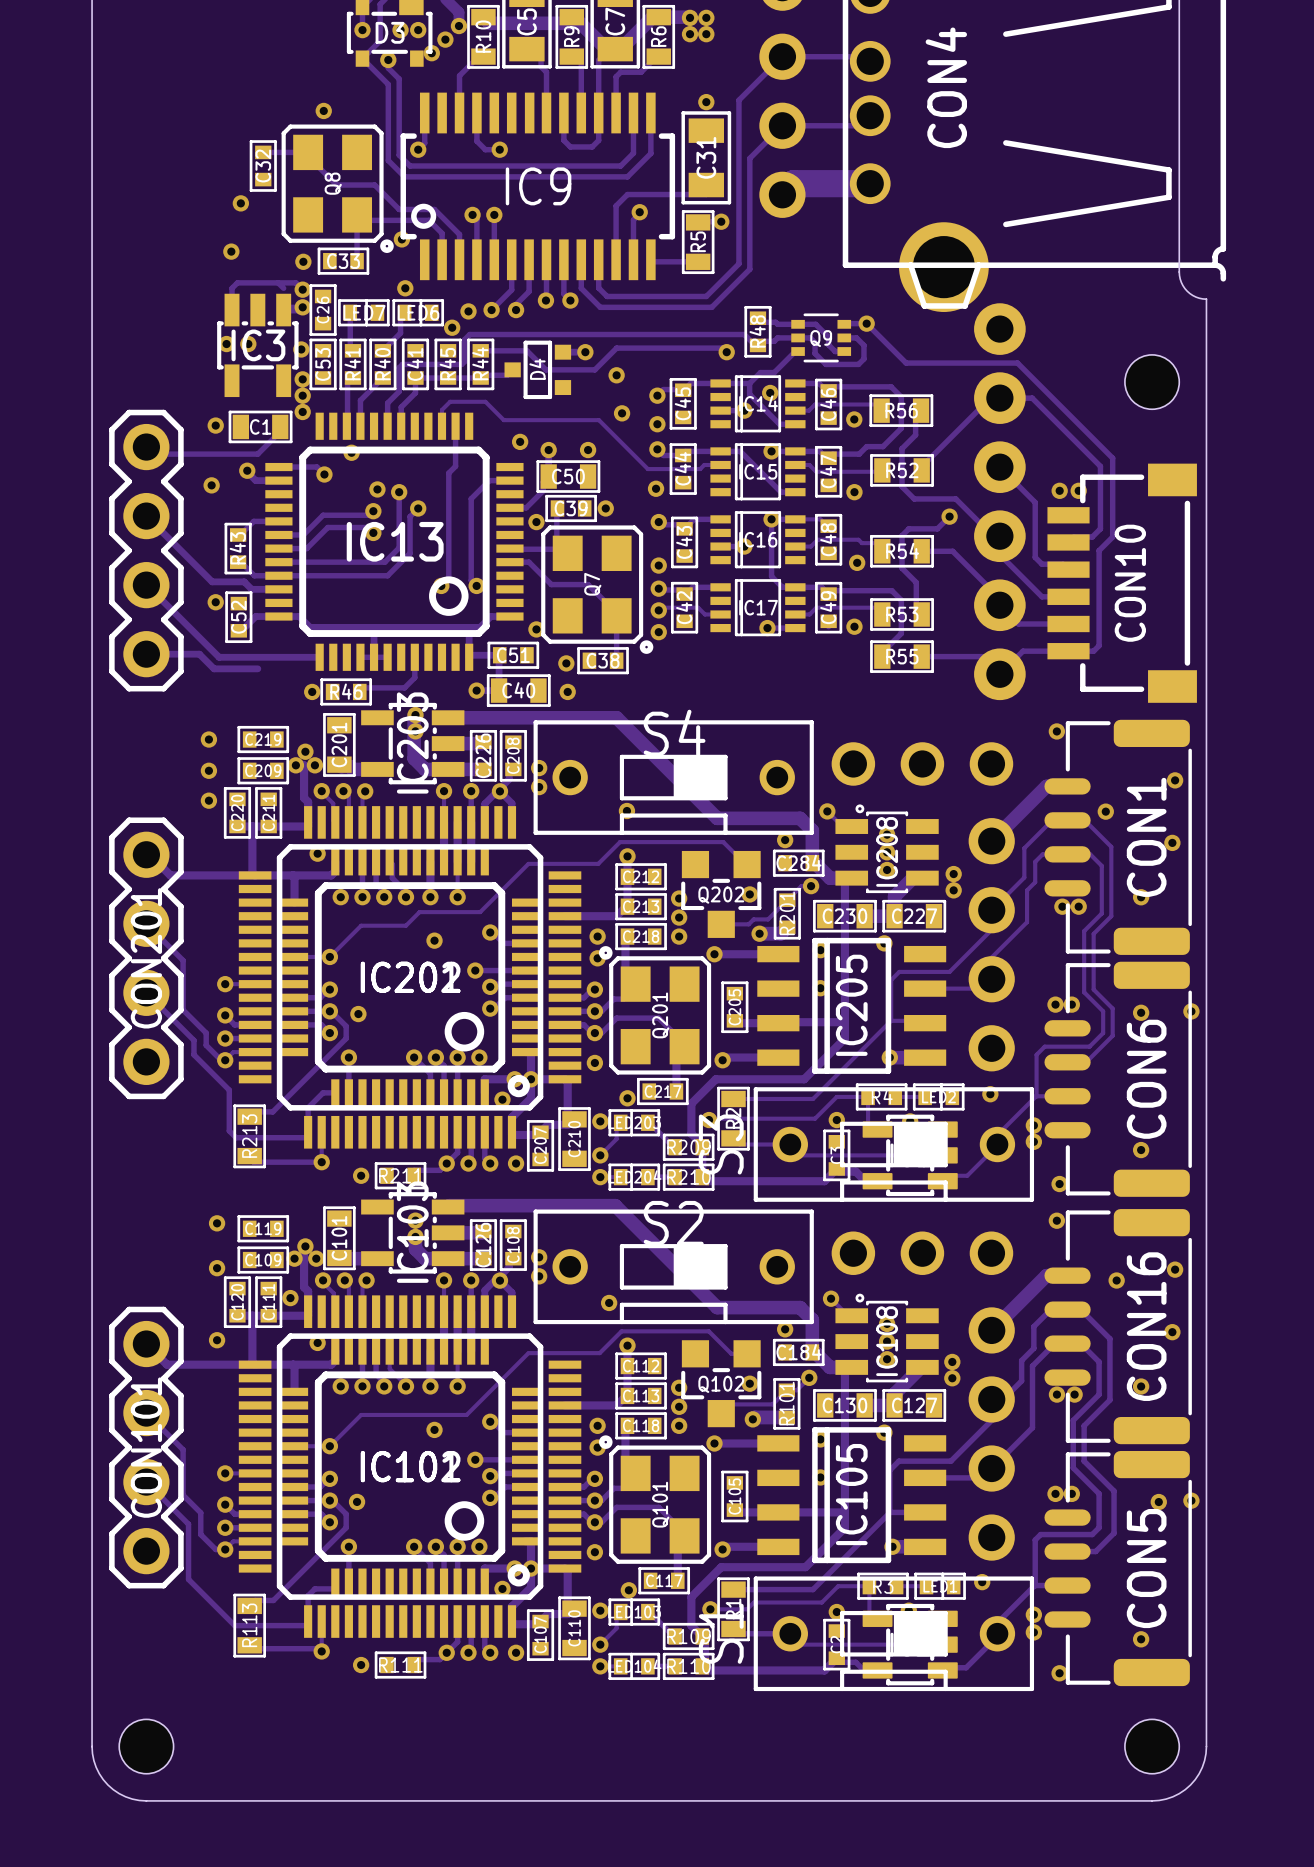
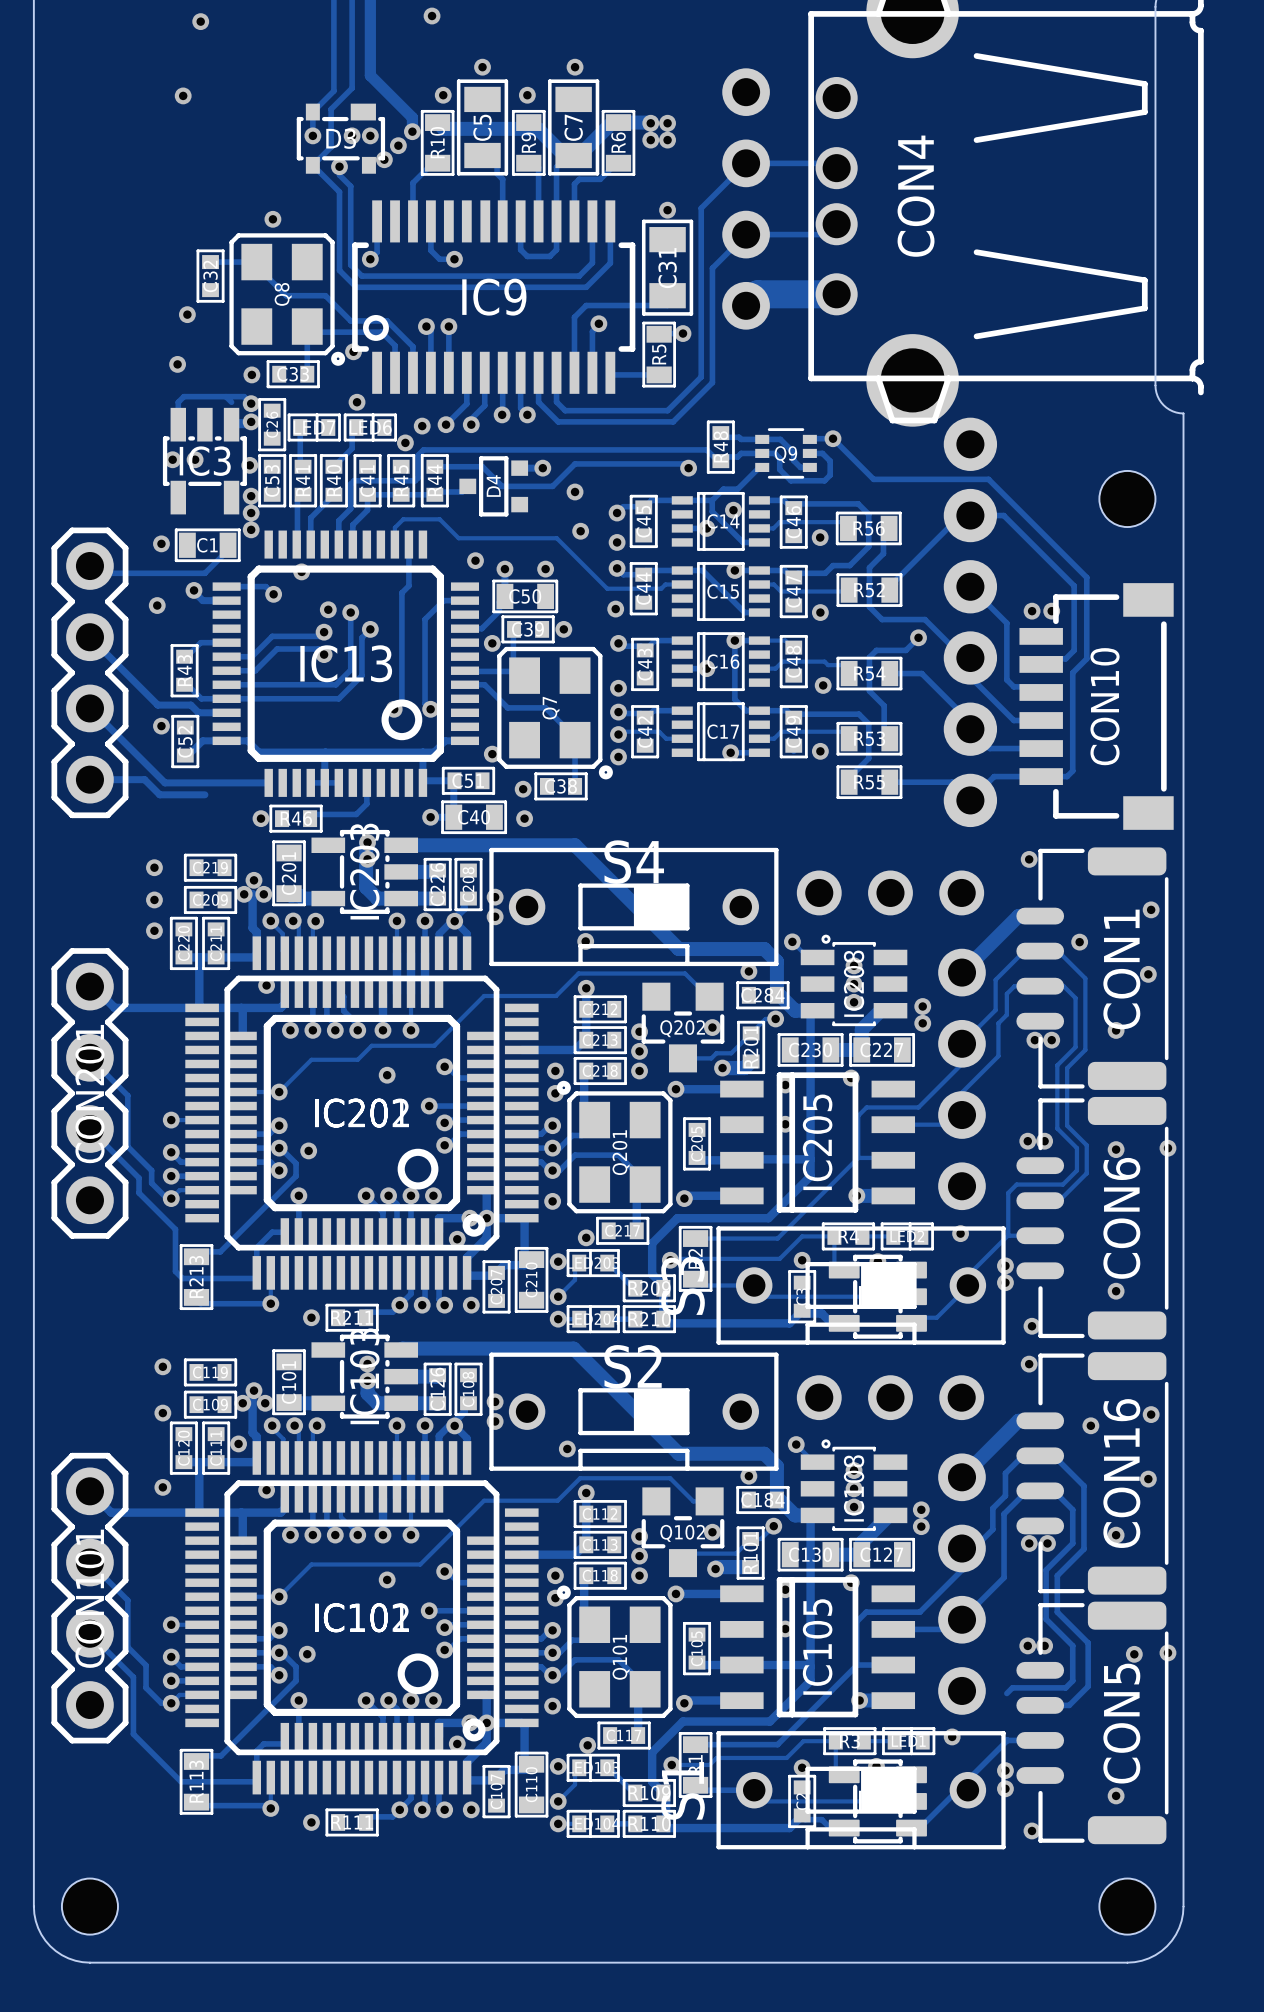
track: (1035, 1539) (1035, 1585) (997, 1622) (997, 1636) (966, 1667) (949, 1667) (943, 1670) -> (1007, 1740) (919, 1827) (911, 1827)

